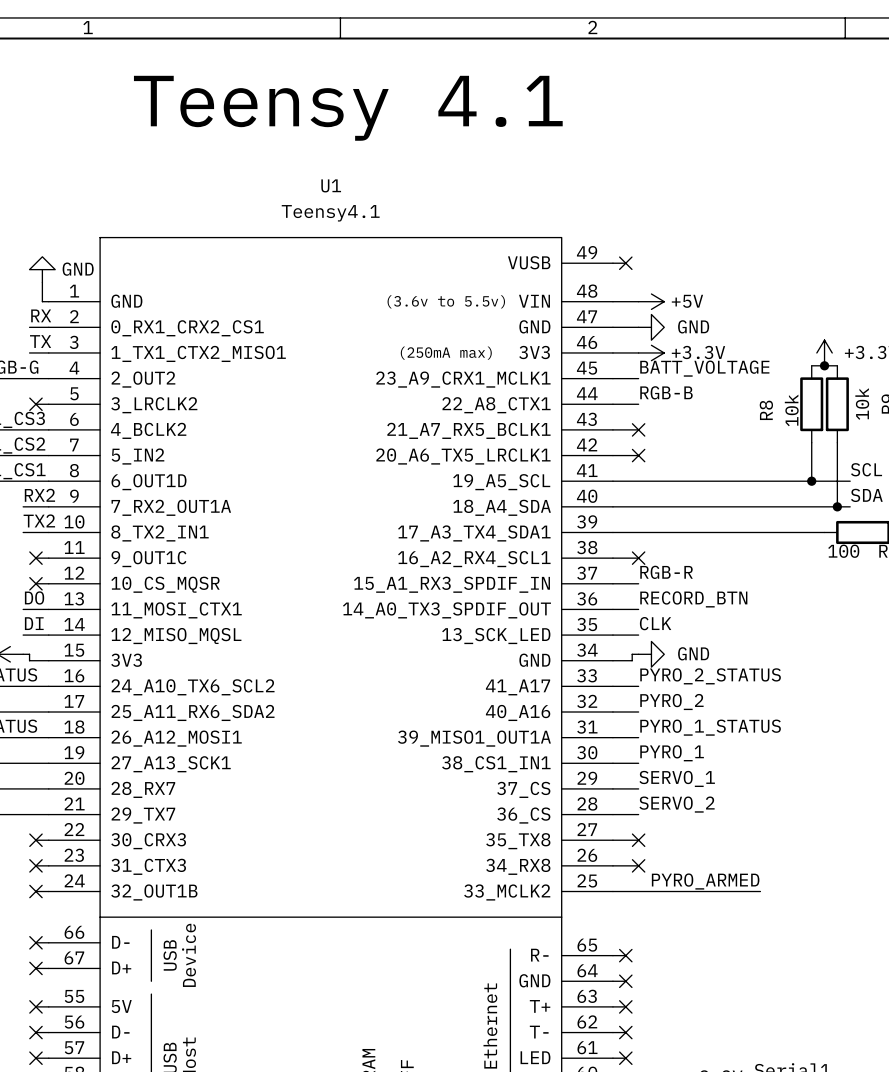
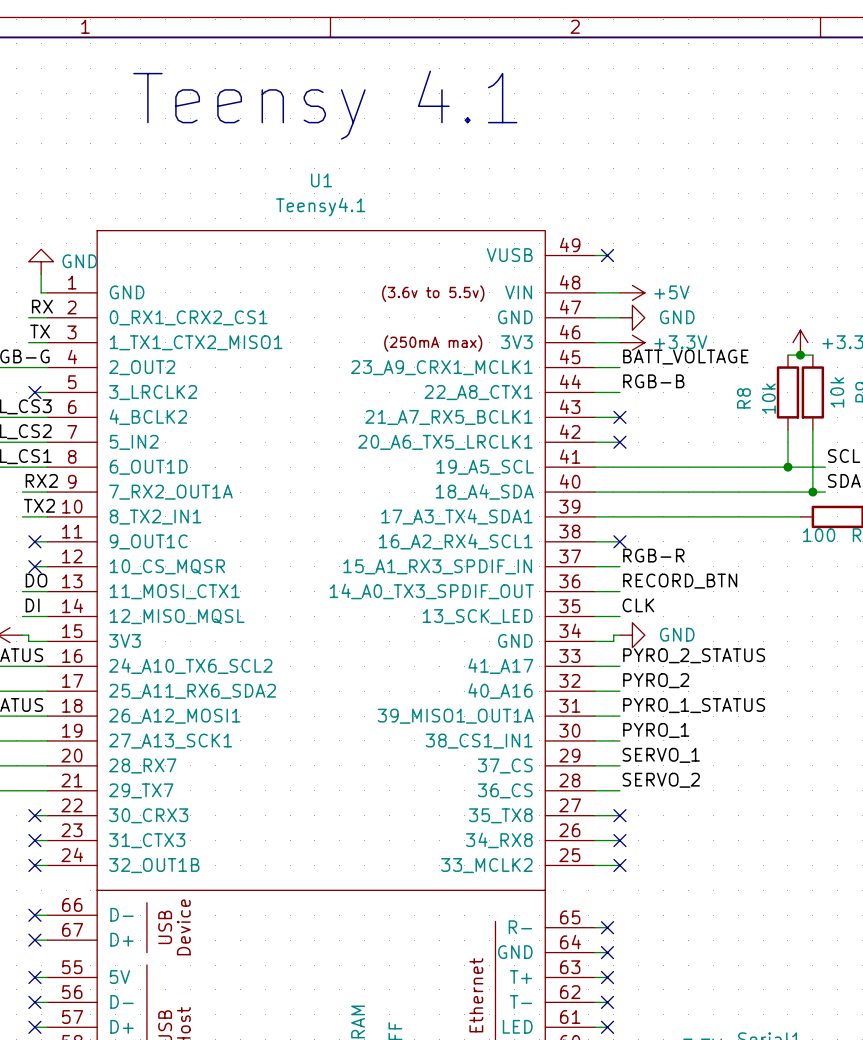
label: PYRO_ARMED (705, 881) -> none
wire: (638, 891) (760, 891) -> none
no-connect mark: none -> (619, 865)

